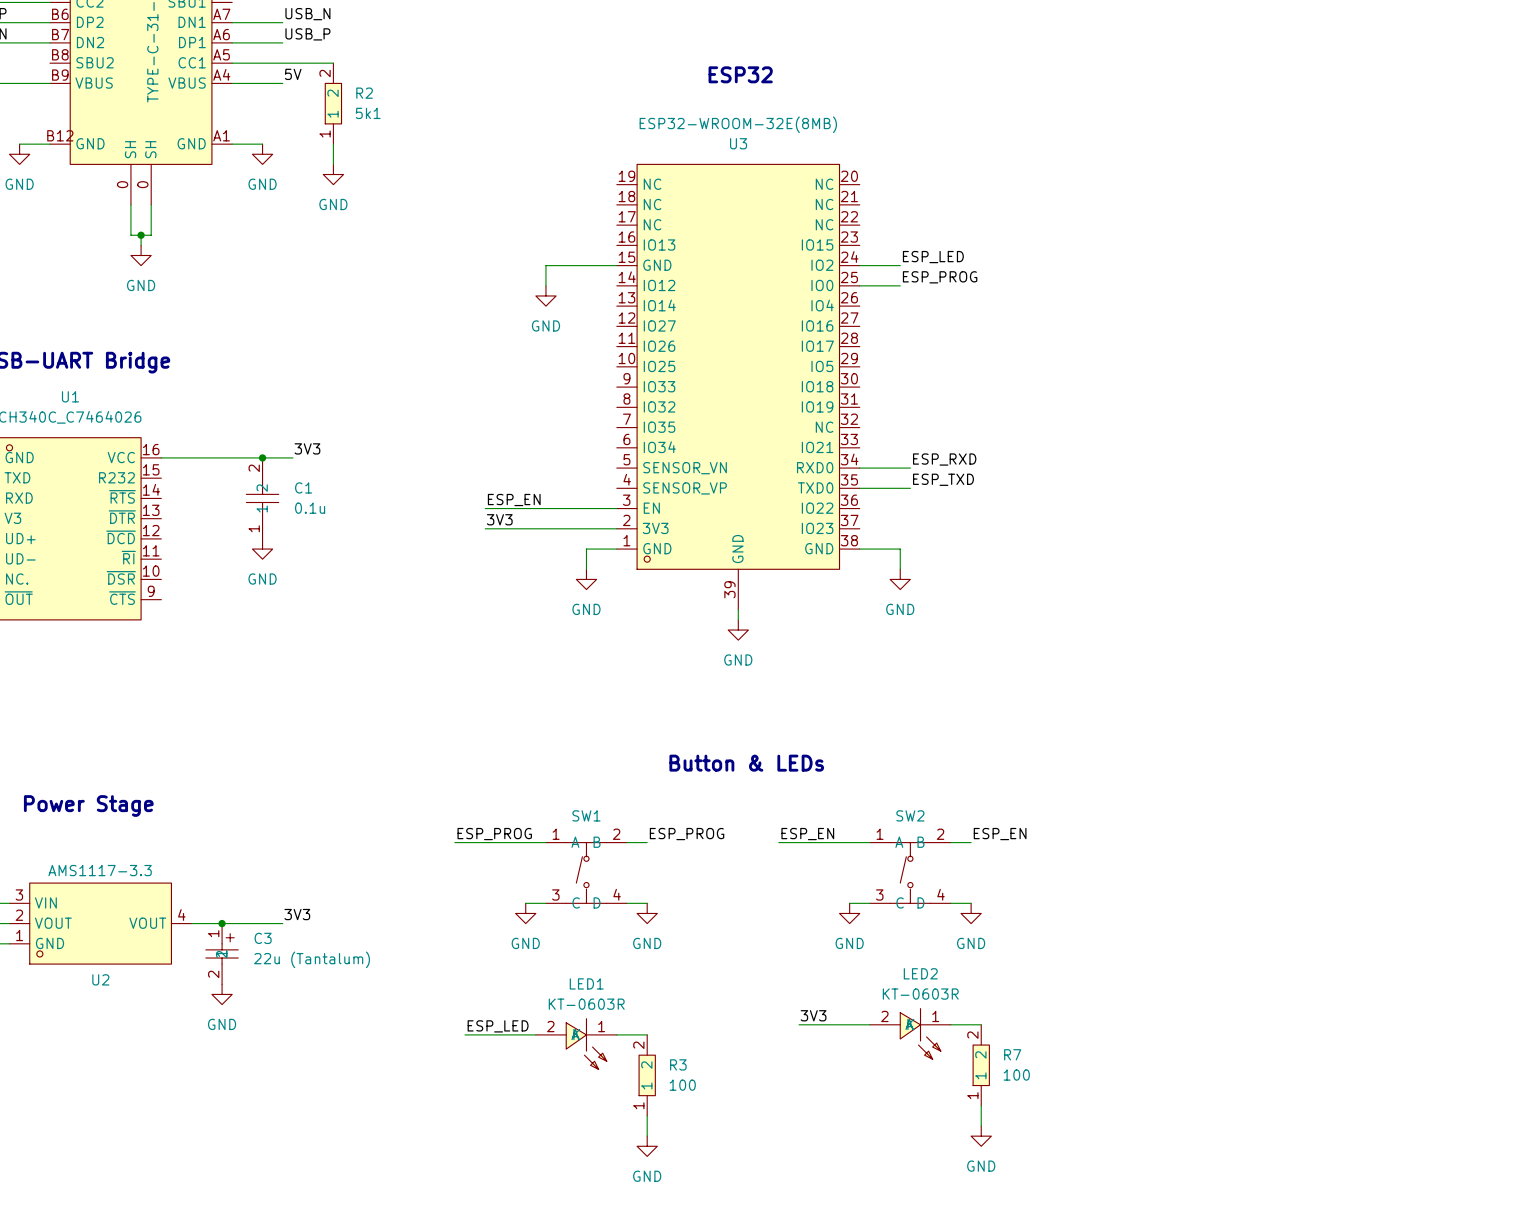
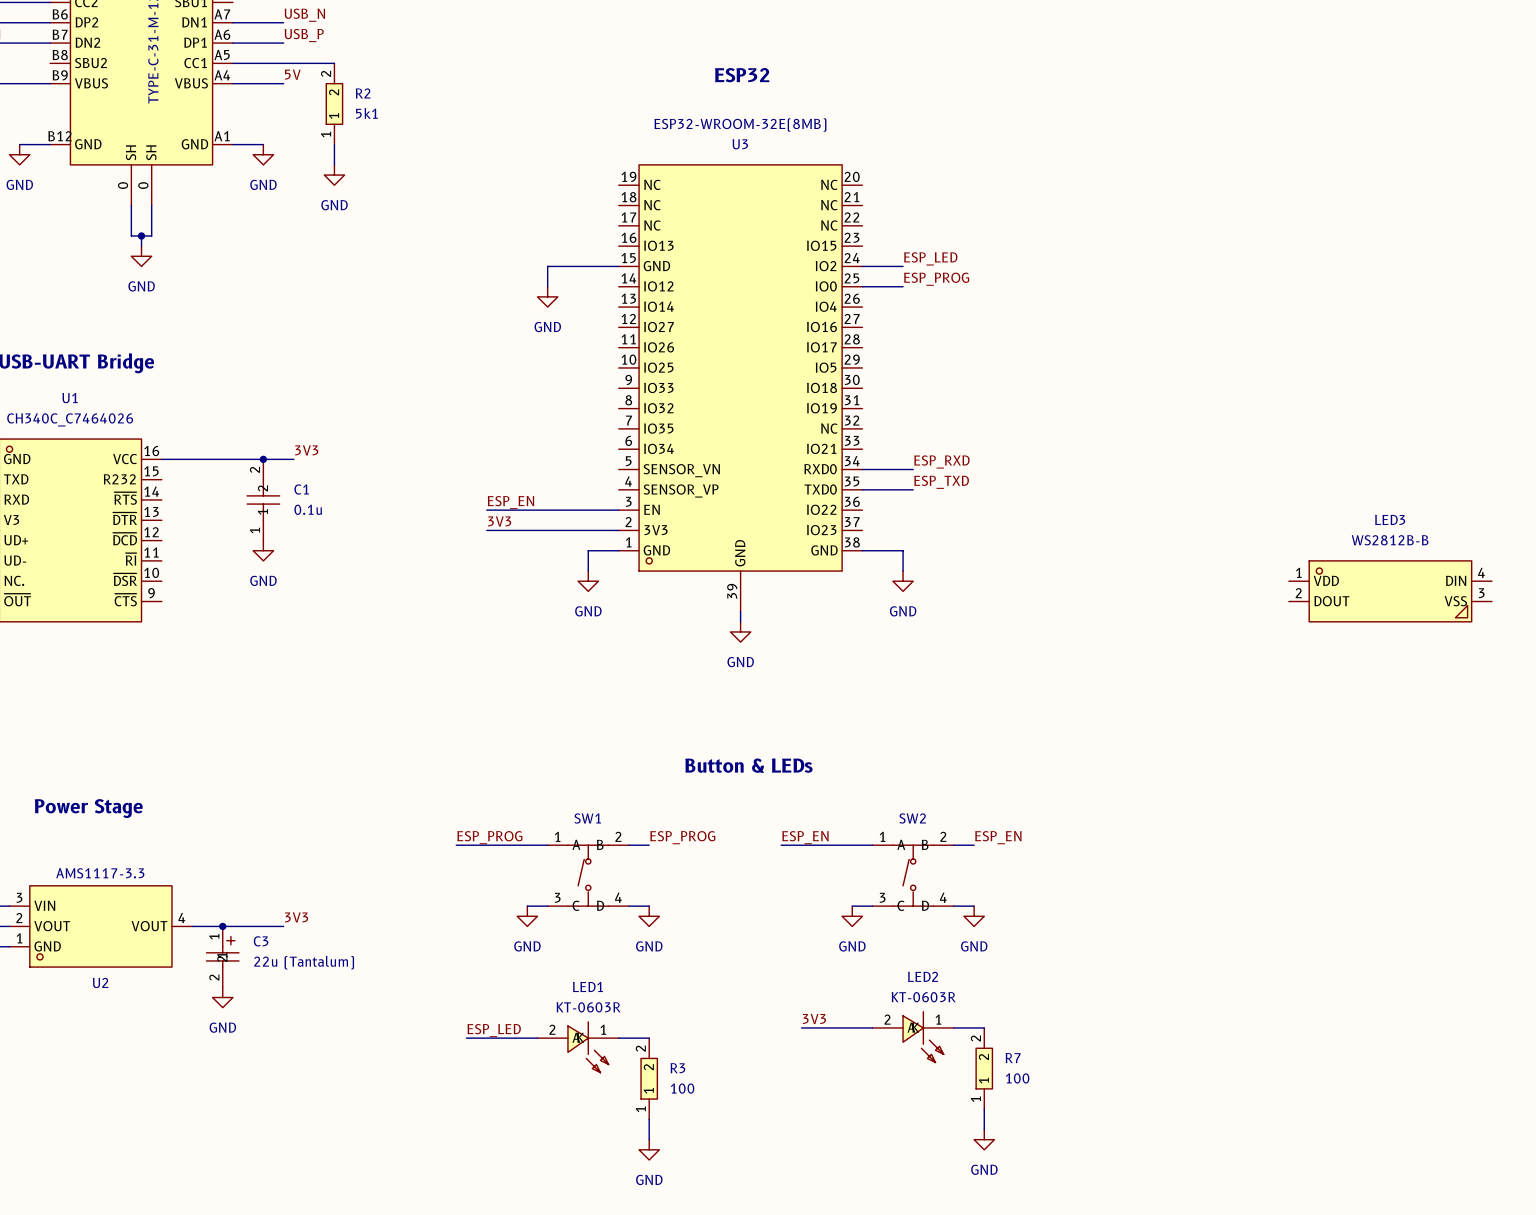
LED3: none -> WS2812B-B (1390, 591)

